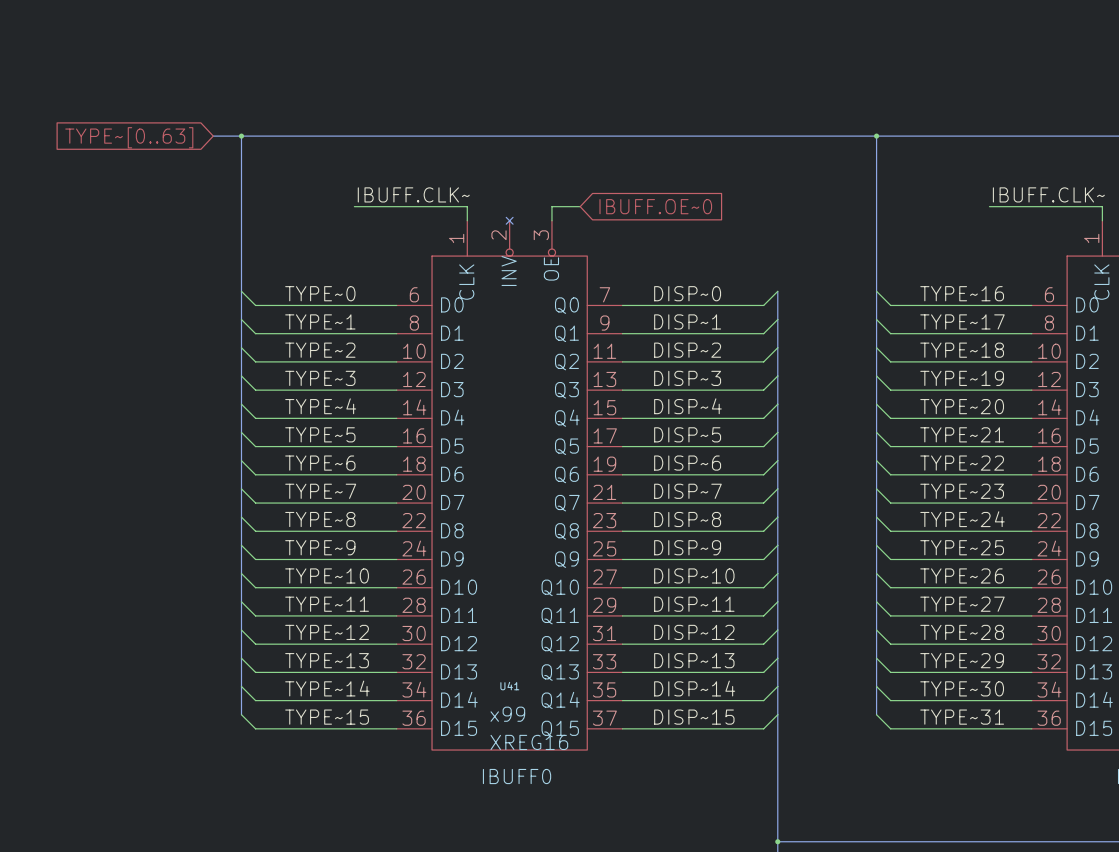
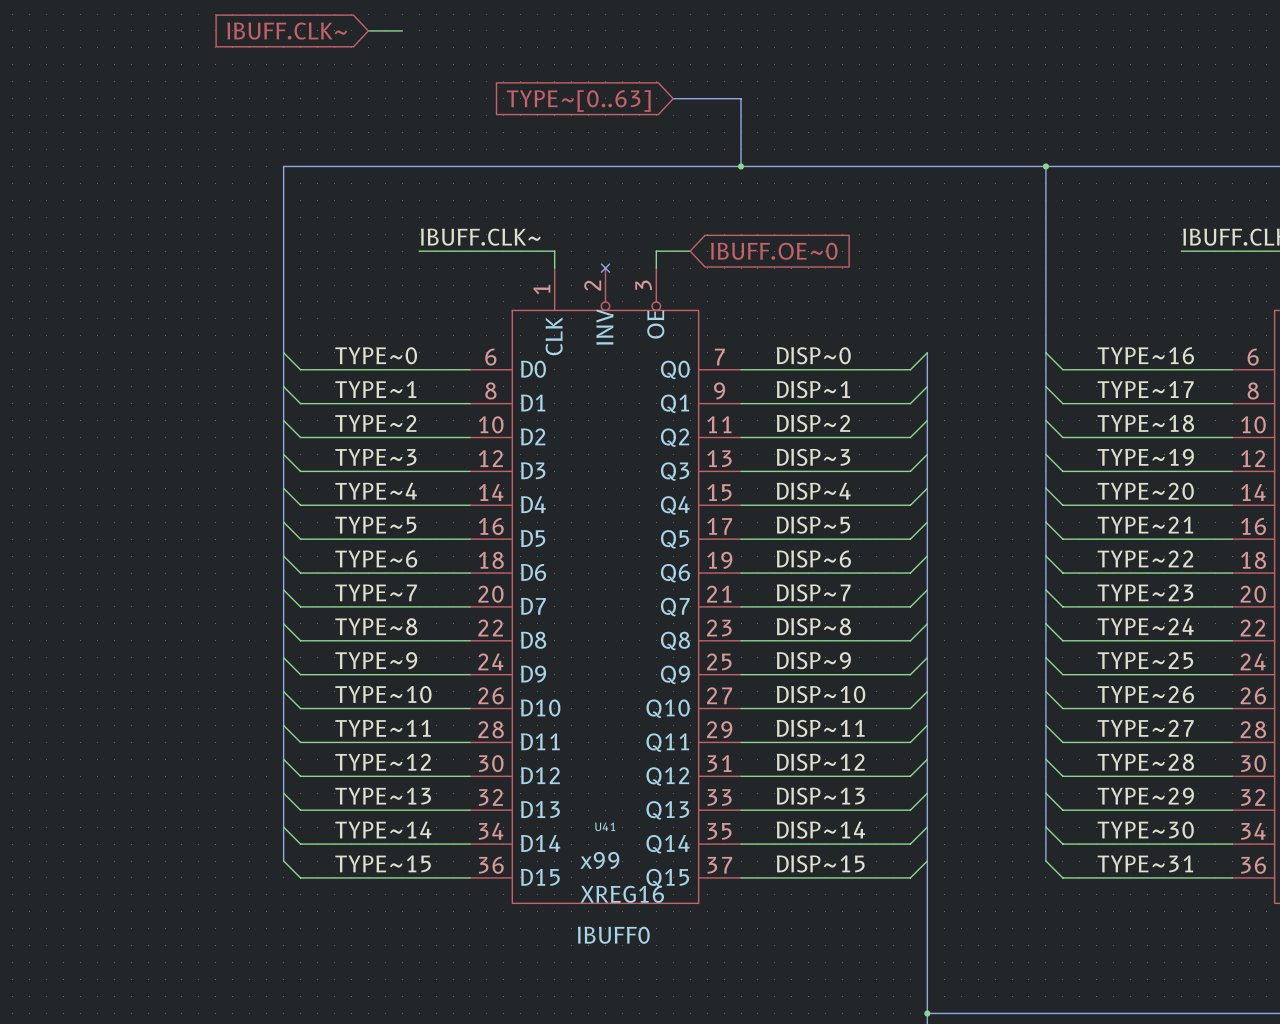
global label: none -> IBUFF.CLK~ (287, 31)
wire: none -> (368, 30) (402, 30)
bus: none -> (673, 98) (741, 98) (741, 166)
global label: none -> TYPE~[0..63] (578, 101)
bus: (213, 136) (241, 136) -> none
junction: (241, 136) -> none
junction: none -> (741, 166)
global label: TYPE~[0..63] (129, 137) -> none

